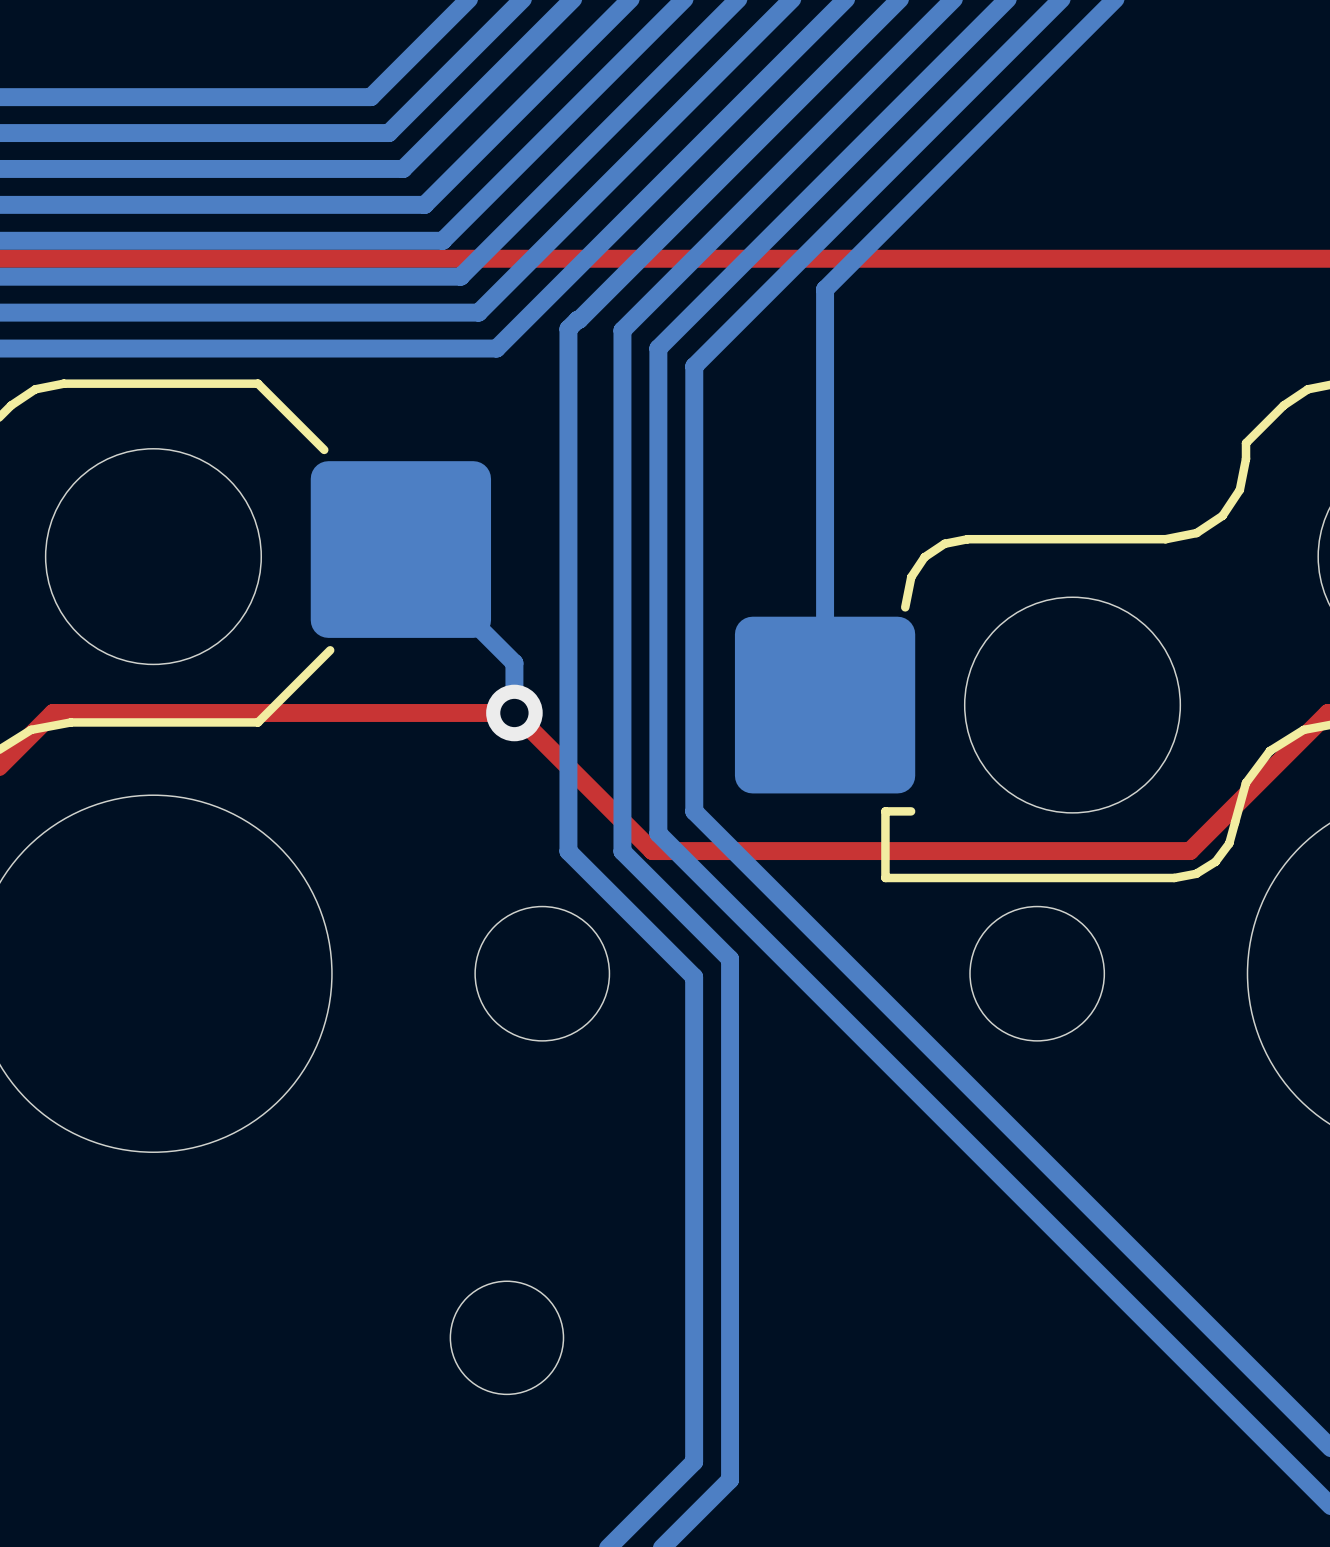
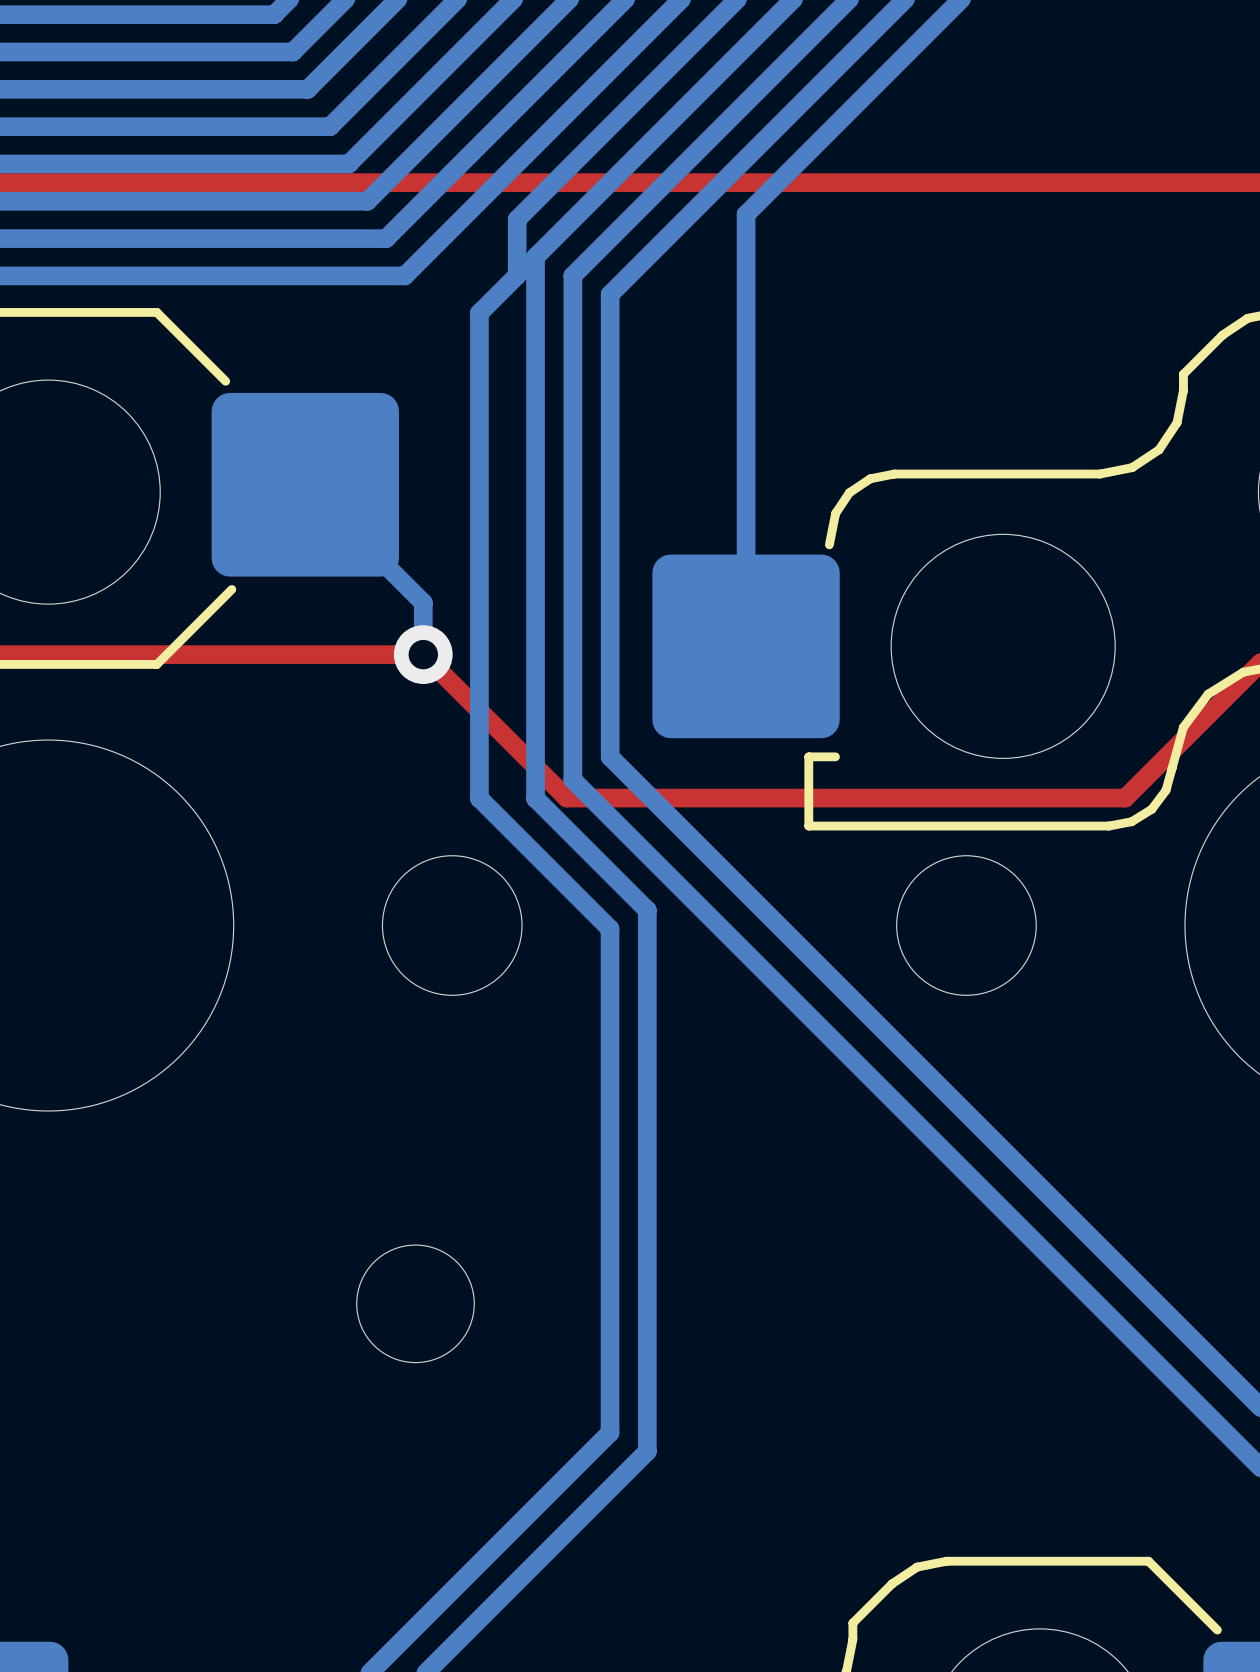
bottom track: (604, 294) (568, 328) (568, 384) -> (517, 219) (517, 275) (479, 313)

